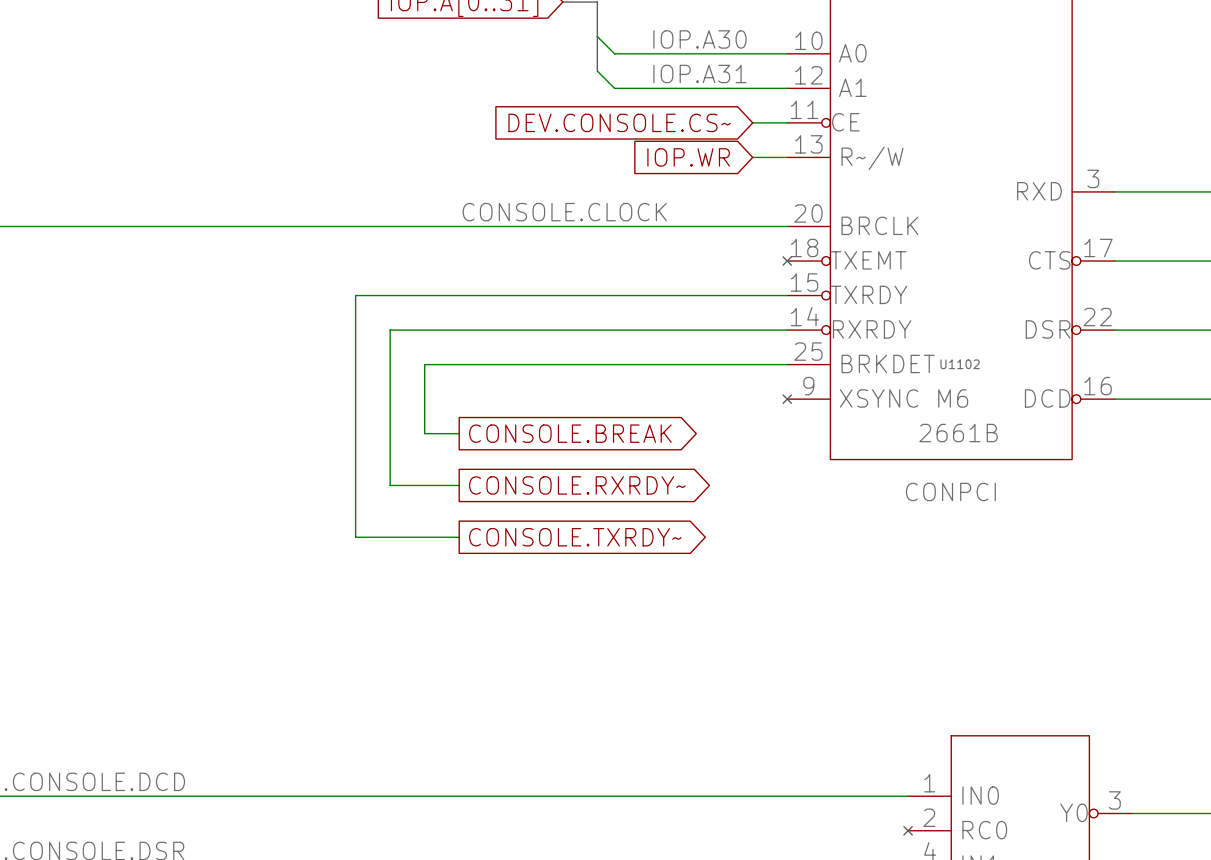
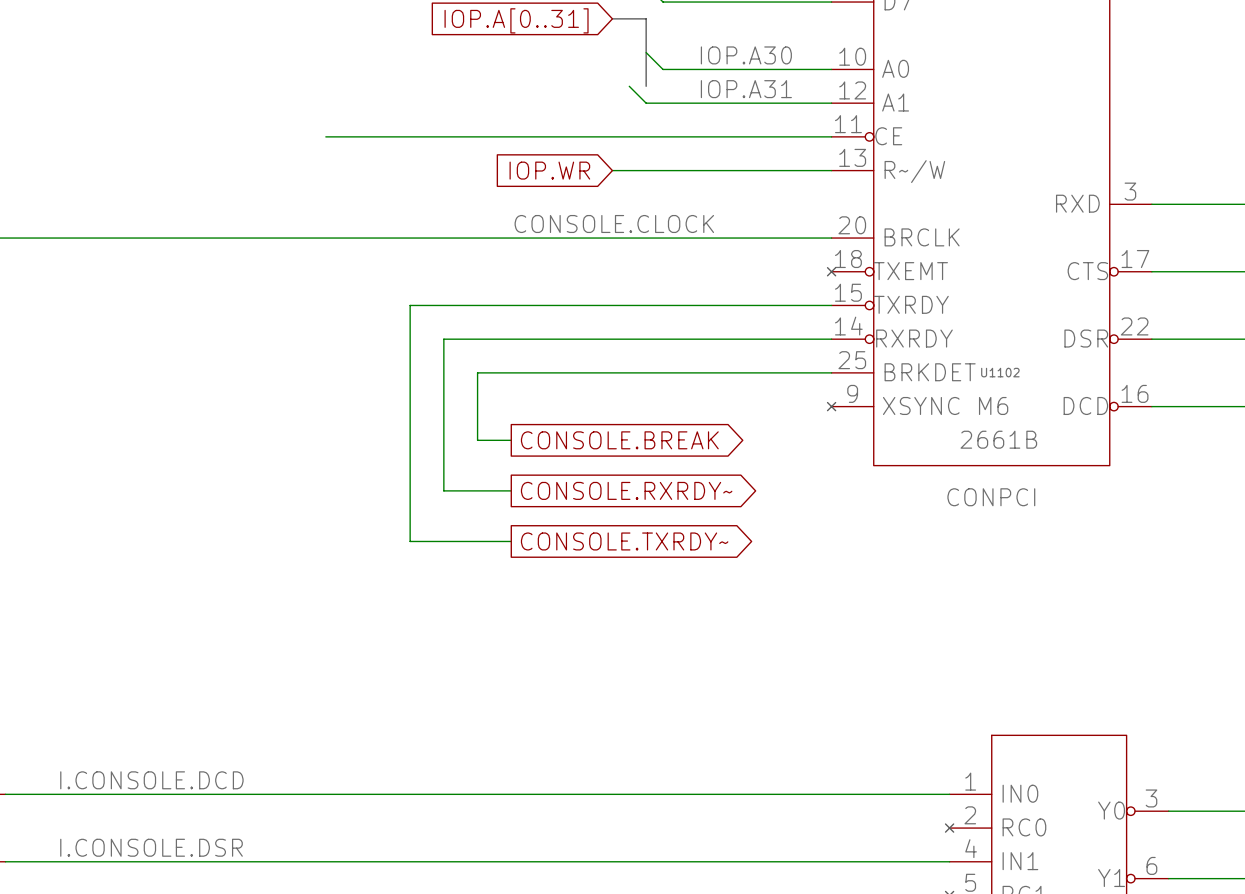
wire: (597, 71) (614, 88) -> (629, 86) (646, 103) (663, 103)
wire: none -> (325, 136) (797, 136)
global label: DEV.CONSOLE.CS~ (619, 122) -> none
global label: none -> IOP.WR (549, 170)
wire: none -> (612, 170) (797, 170)
global label: IOP.WR (688, 157) -> none

